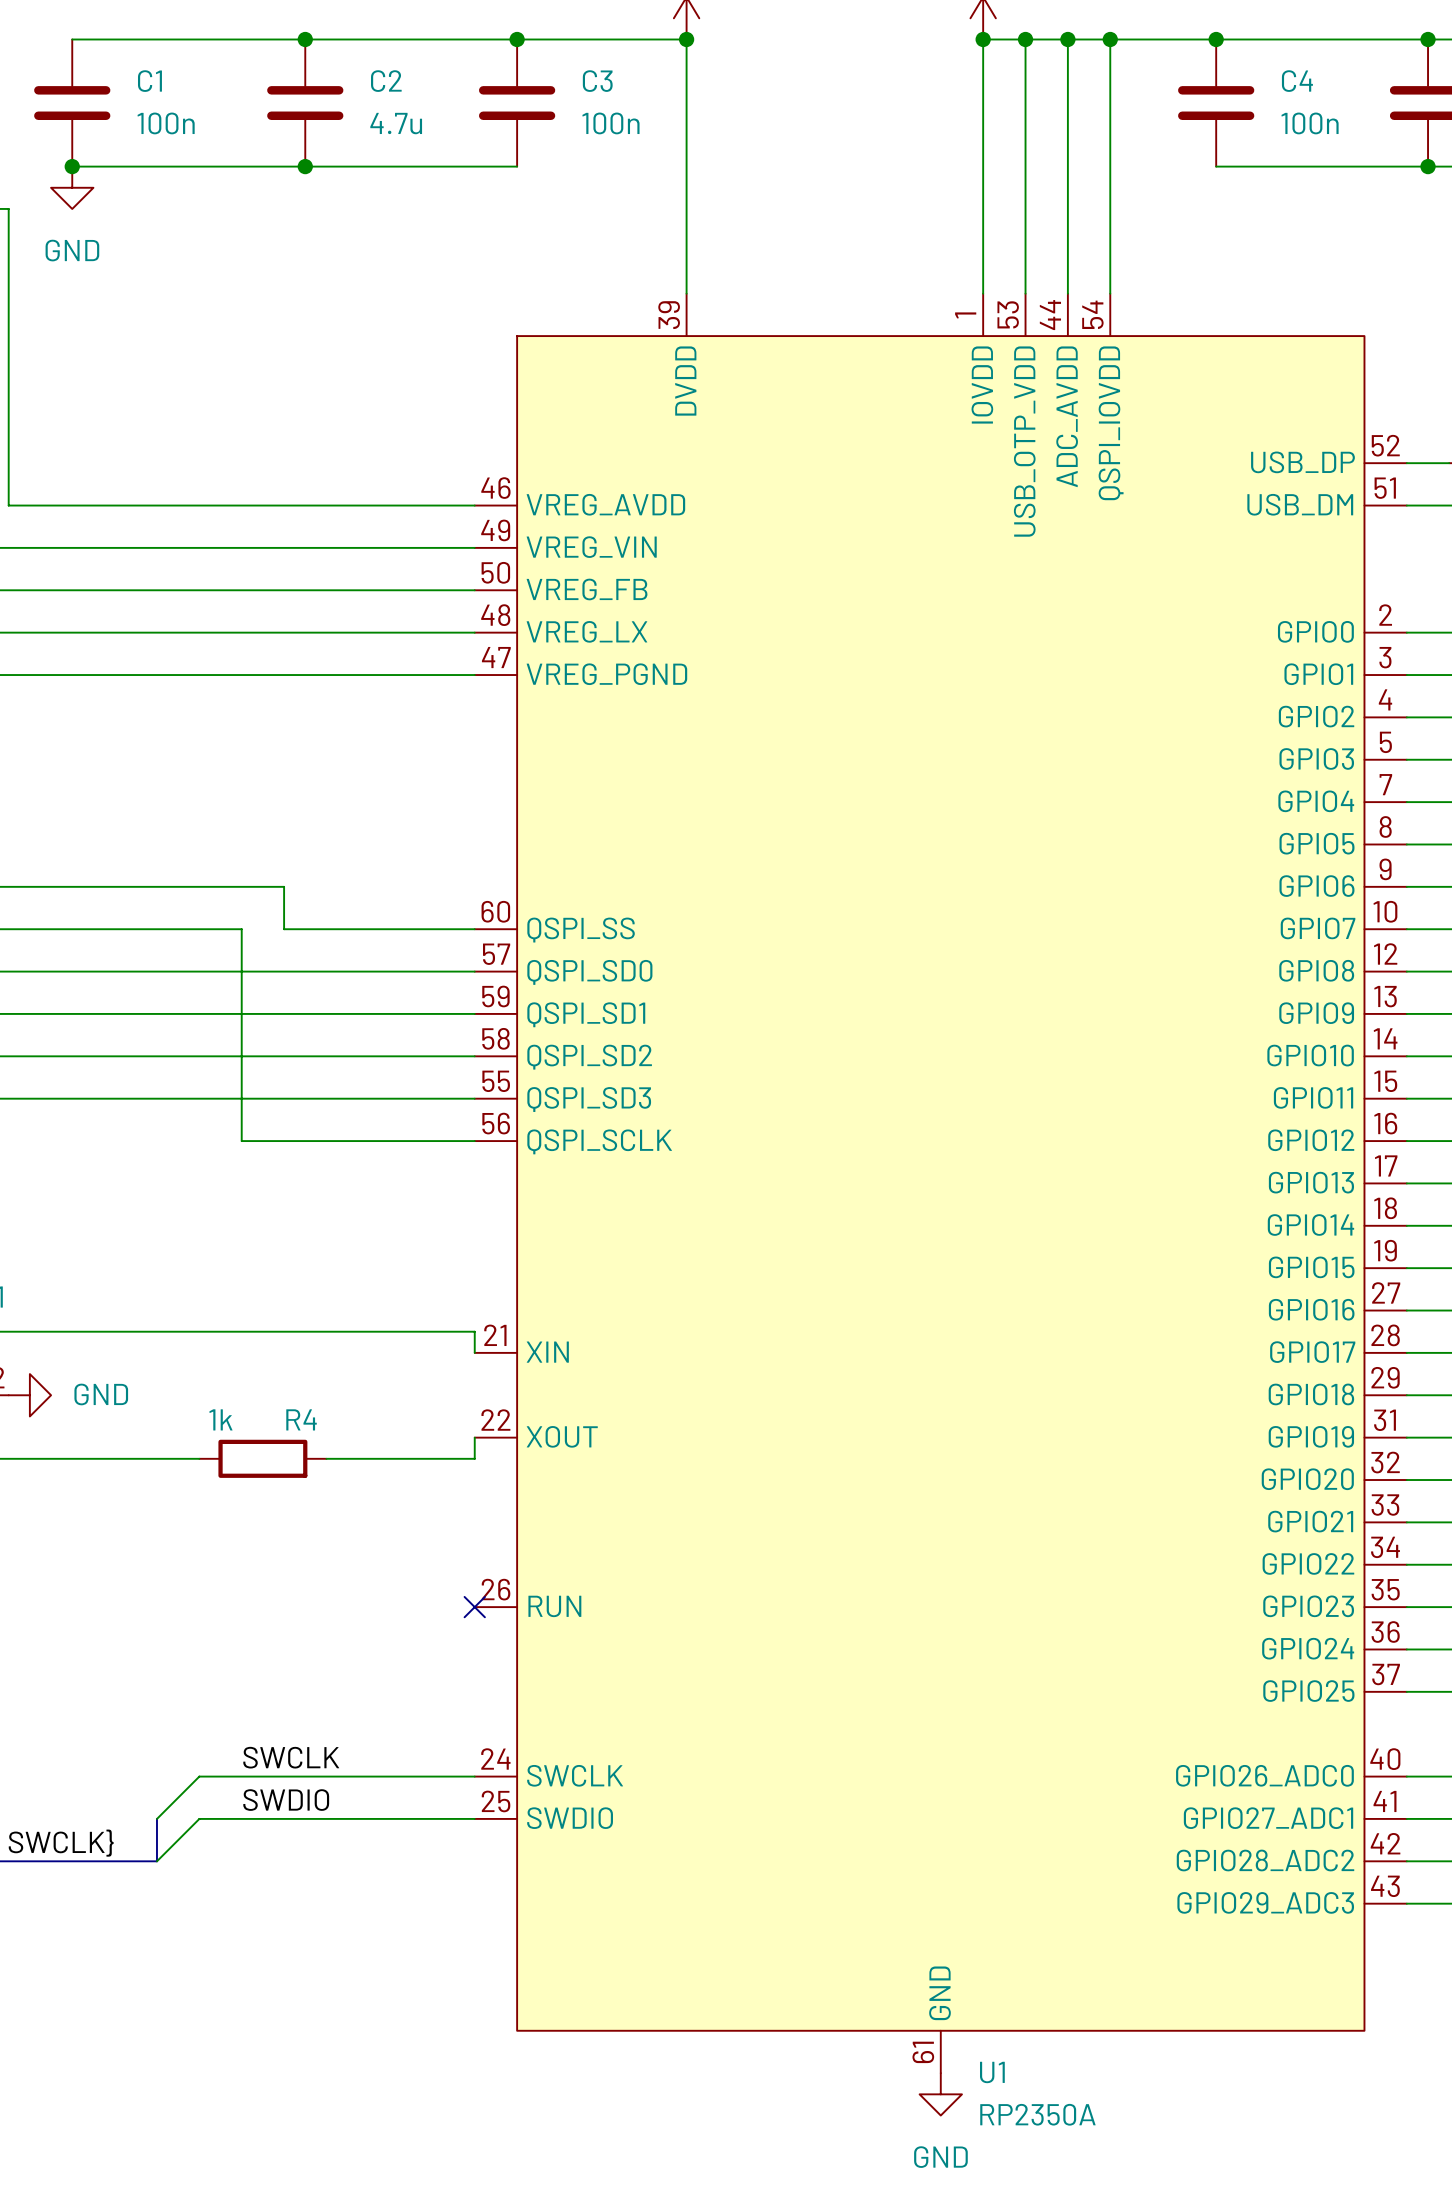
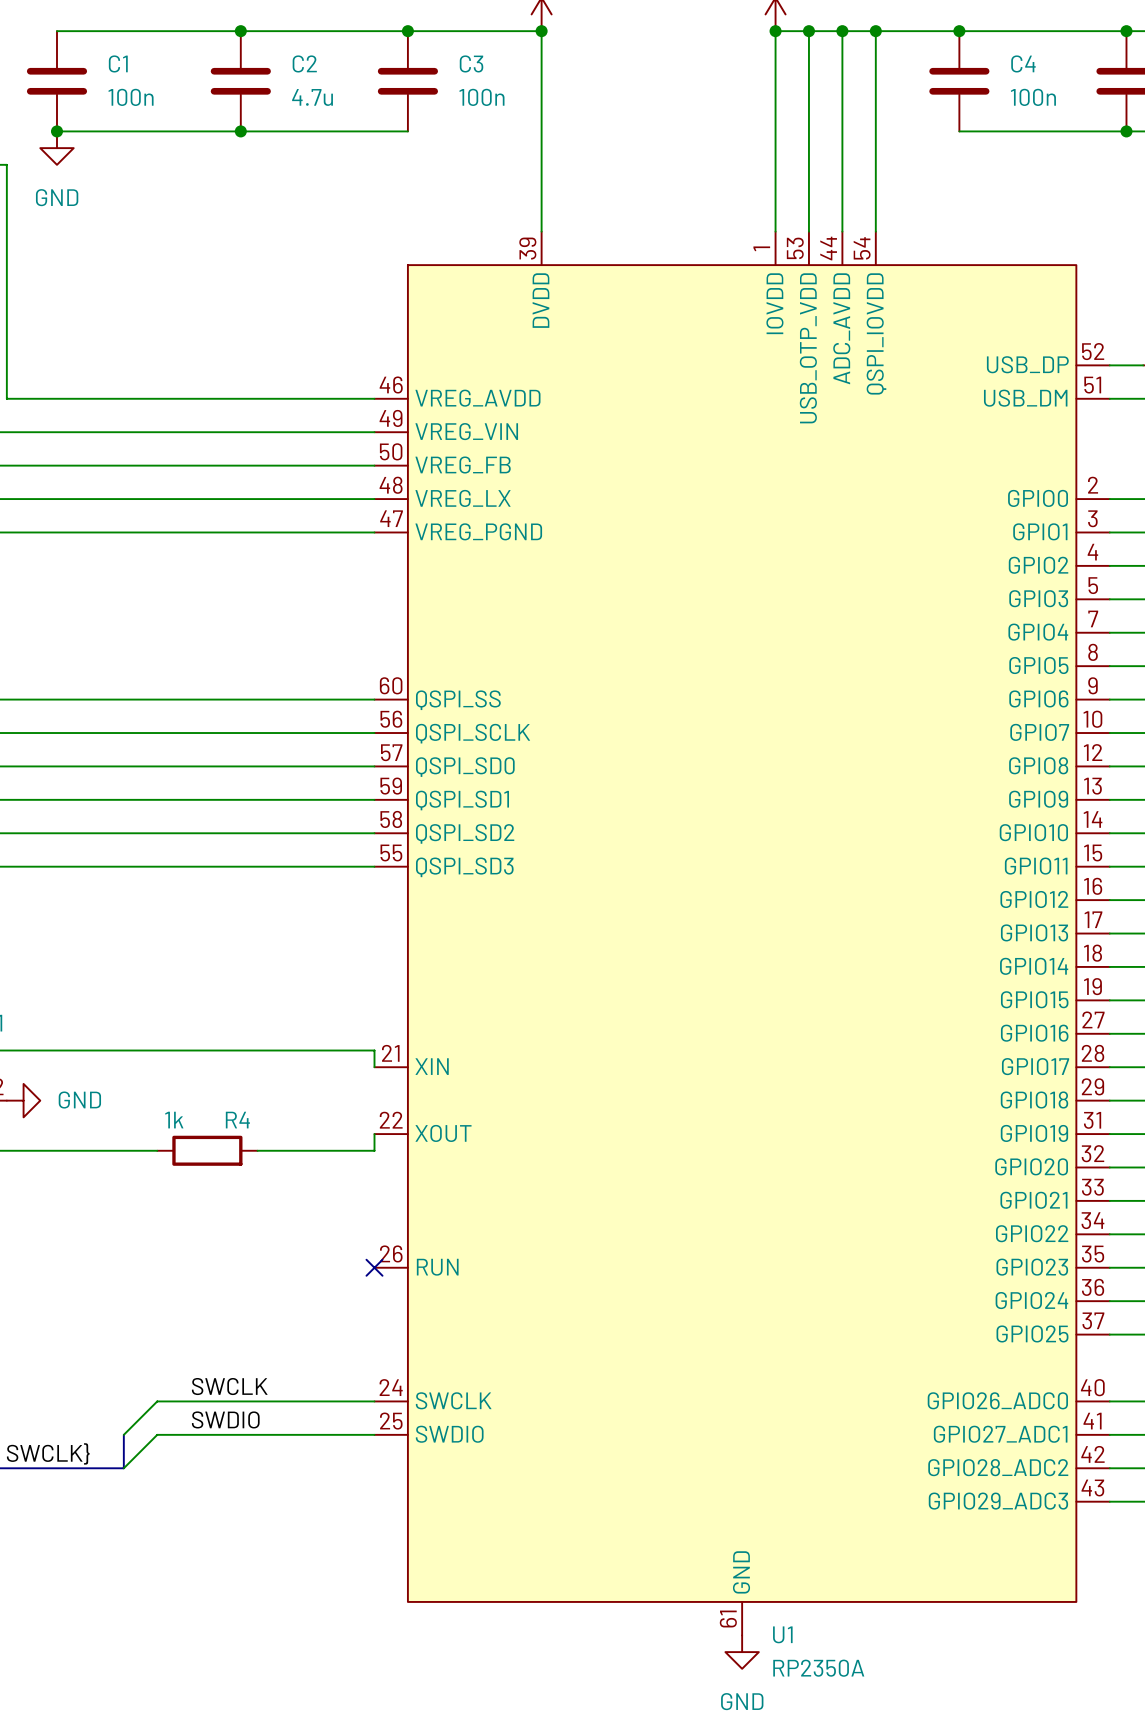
U1 symbol: [474, 293, 1407, 2074] -> [374, 231, 1110, 1636]
wire: (284, 886) (284, 929) -> (190, 733) (224, 733)
wire: none -> (224, 699) (374, 699)
wire: (241, 929) (241, 1141) (474, 1141) -> none

